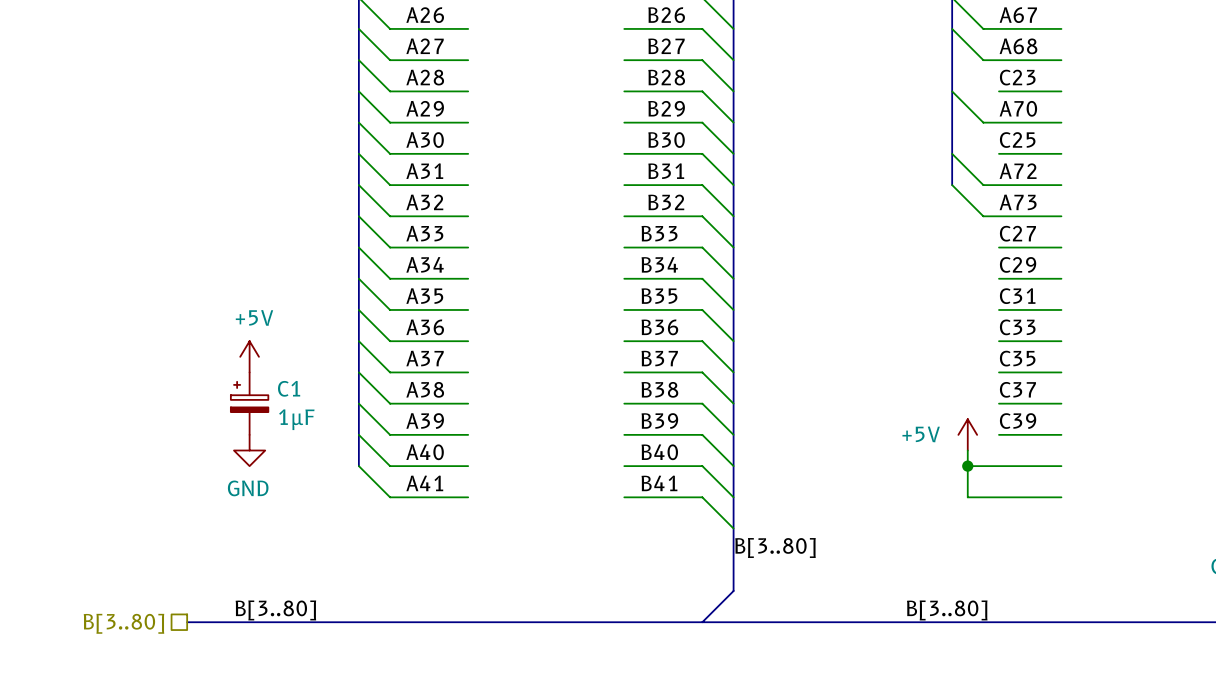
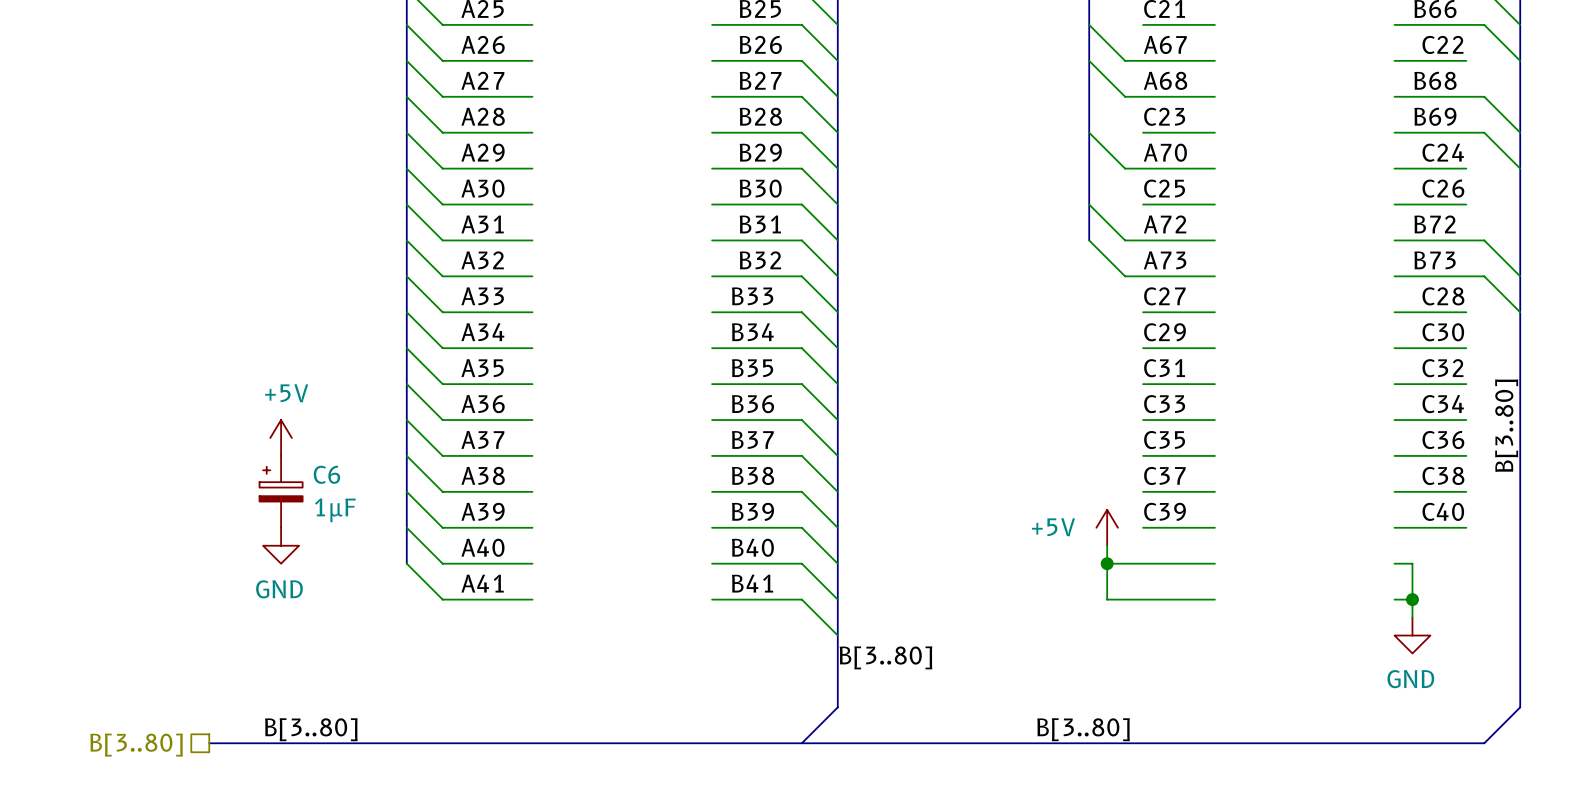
C1 name: C1 (289, 388) -> C6 (326, 474)

